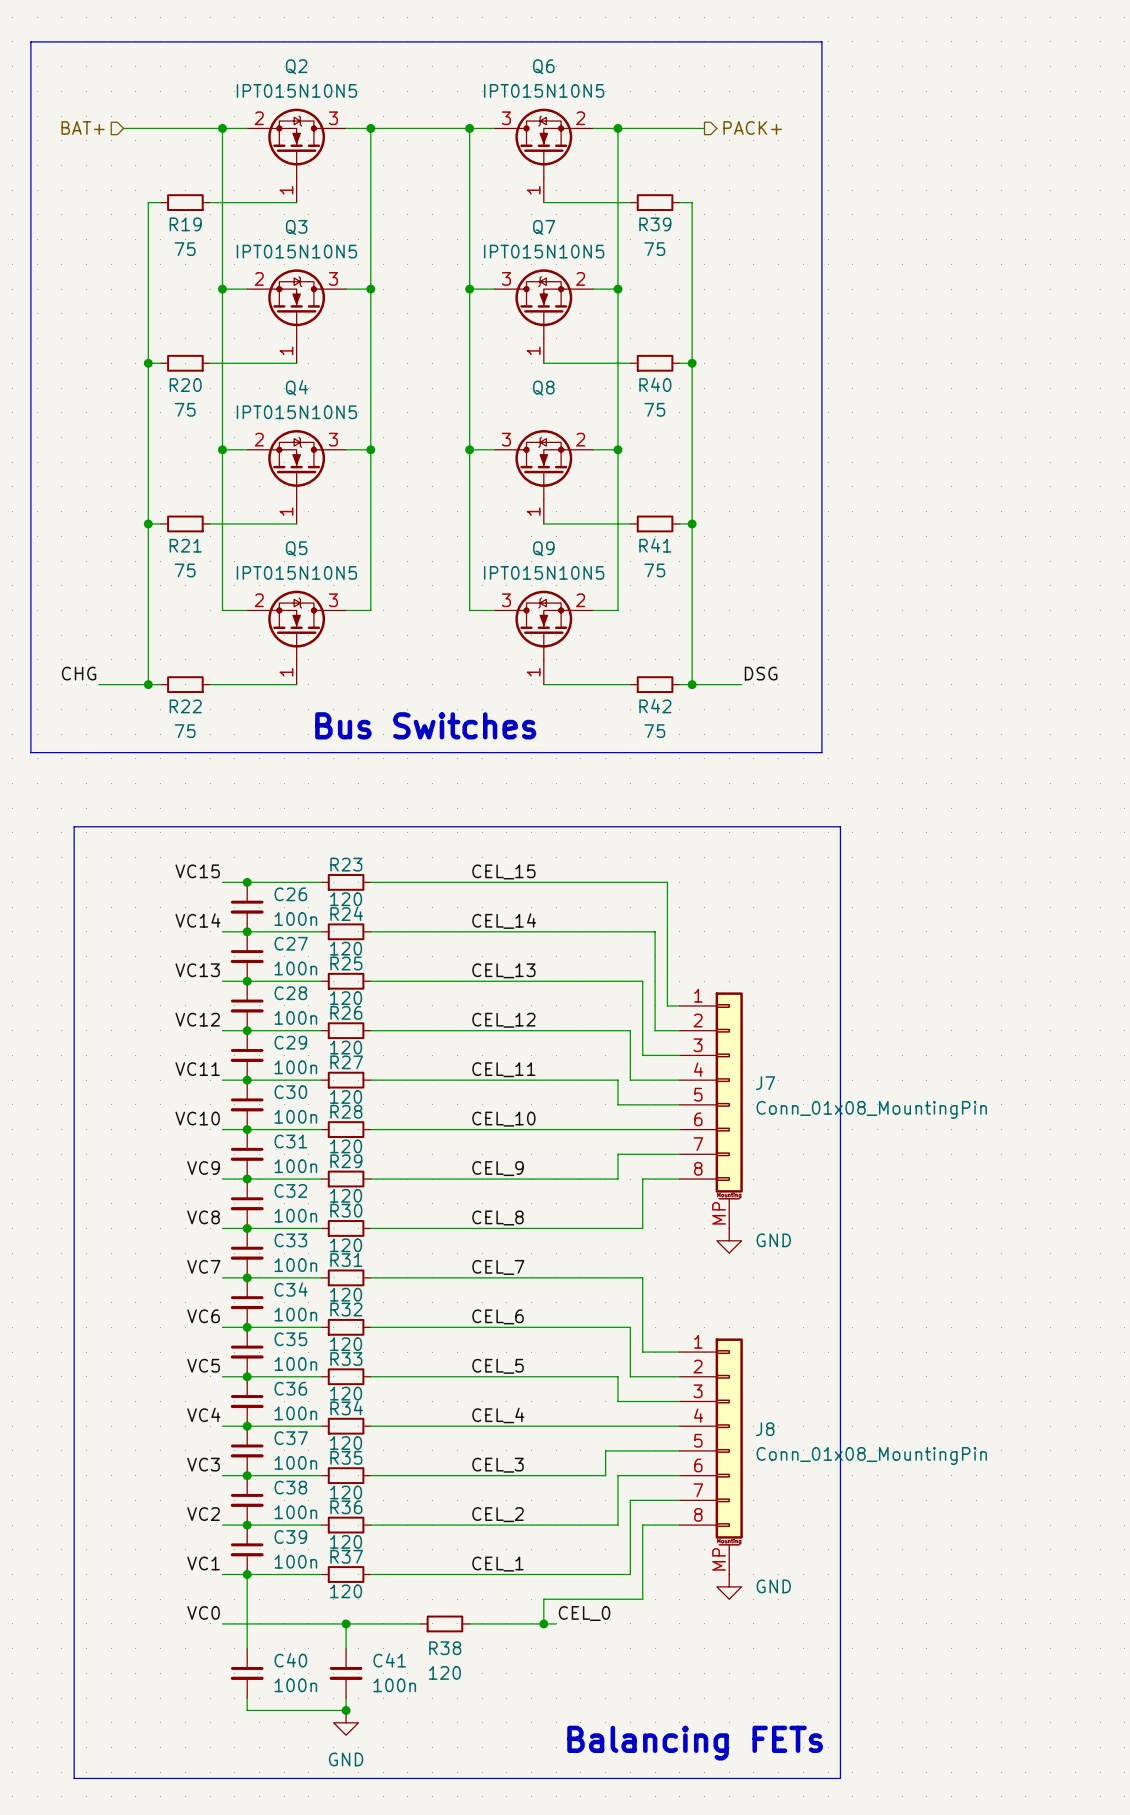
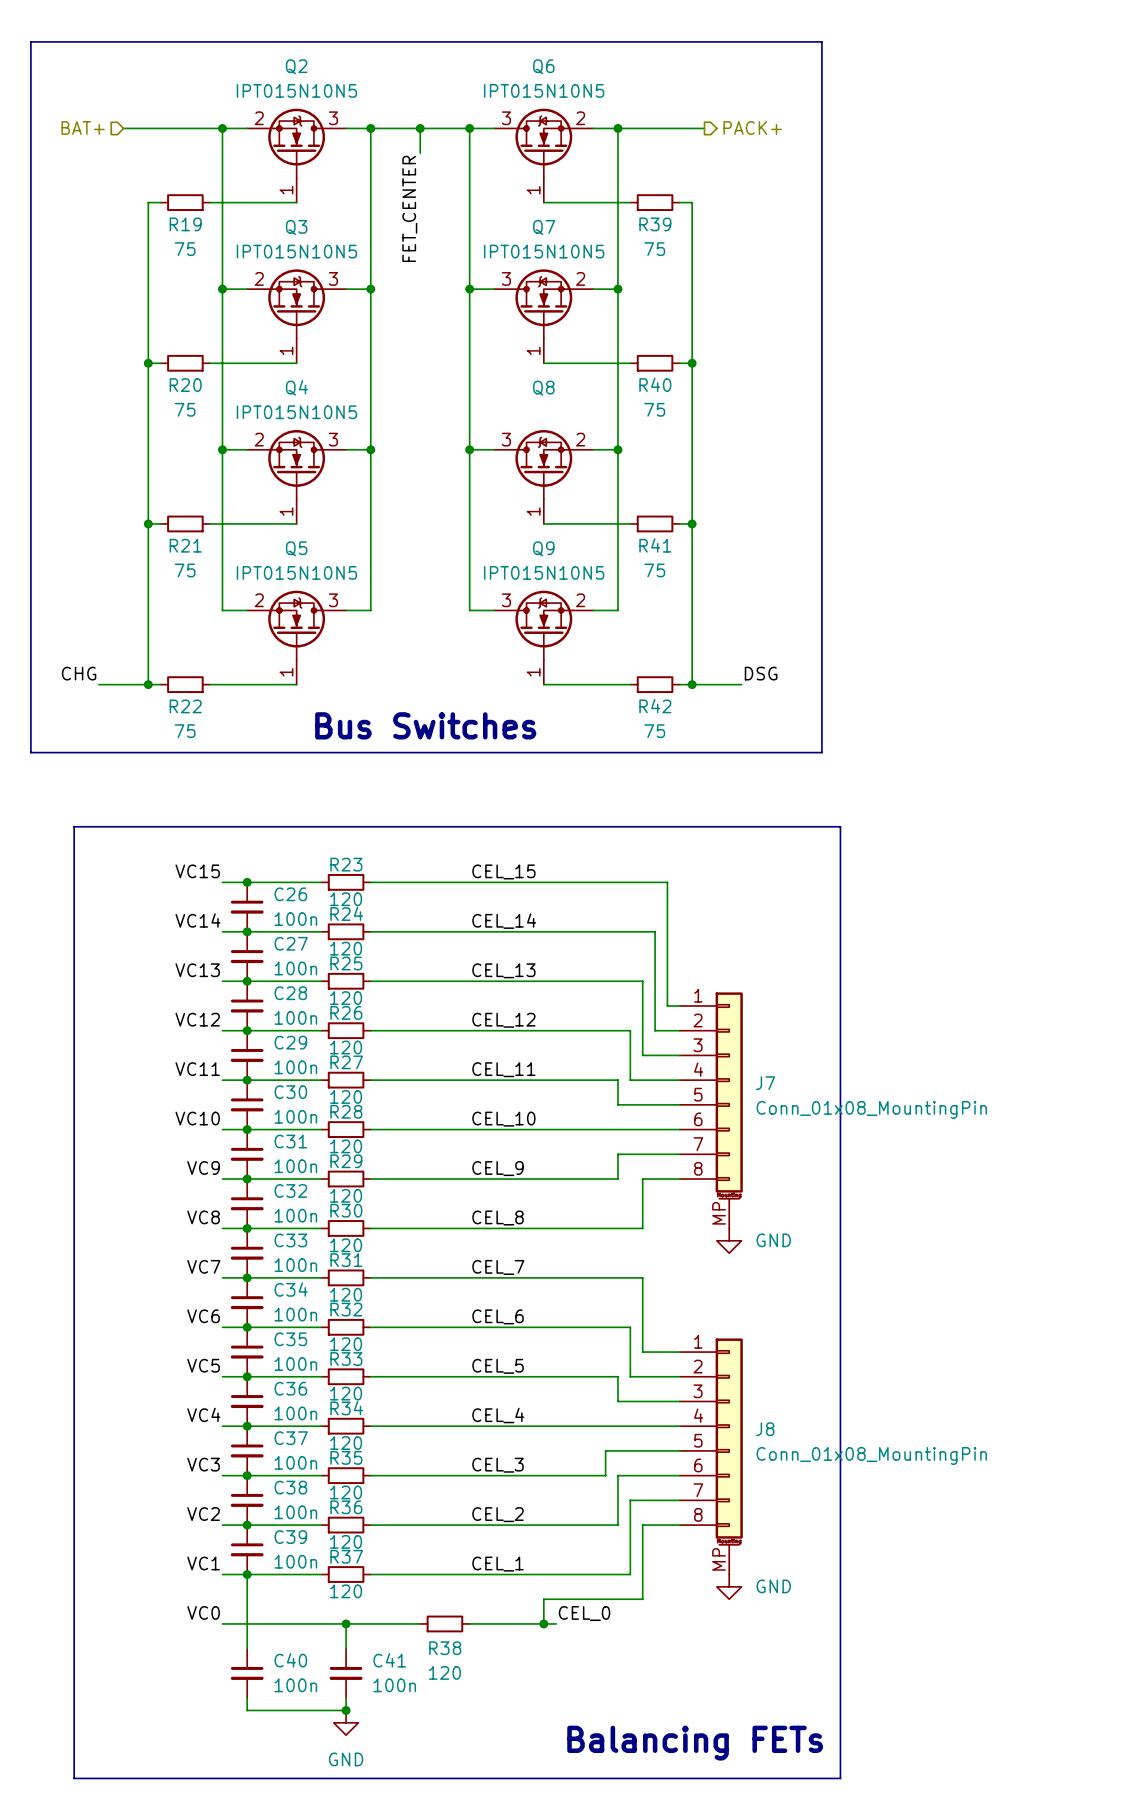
wire: none -> (420, 128) (420, 153)
junction: none -> (420, 128)
label: none -> FET_CENTER (409, 208)

